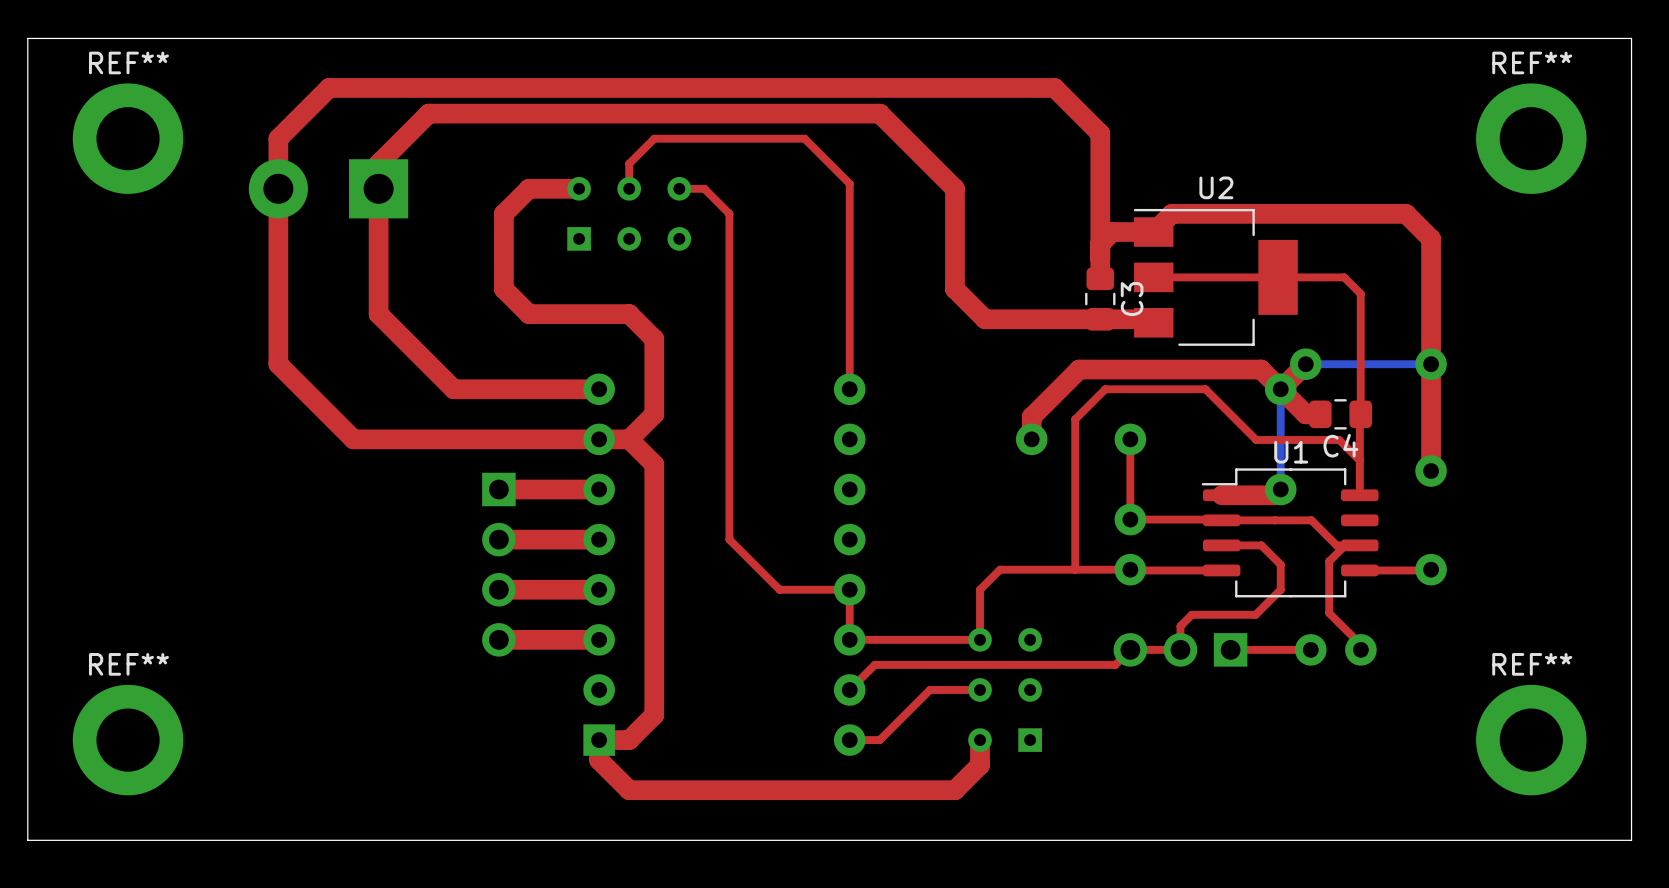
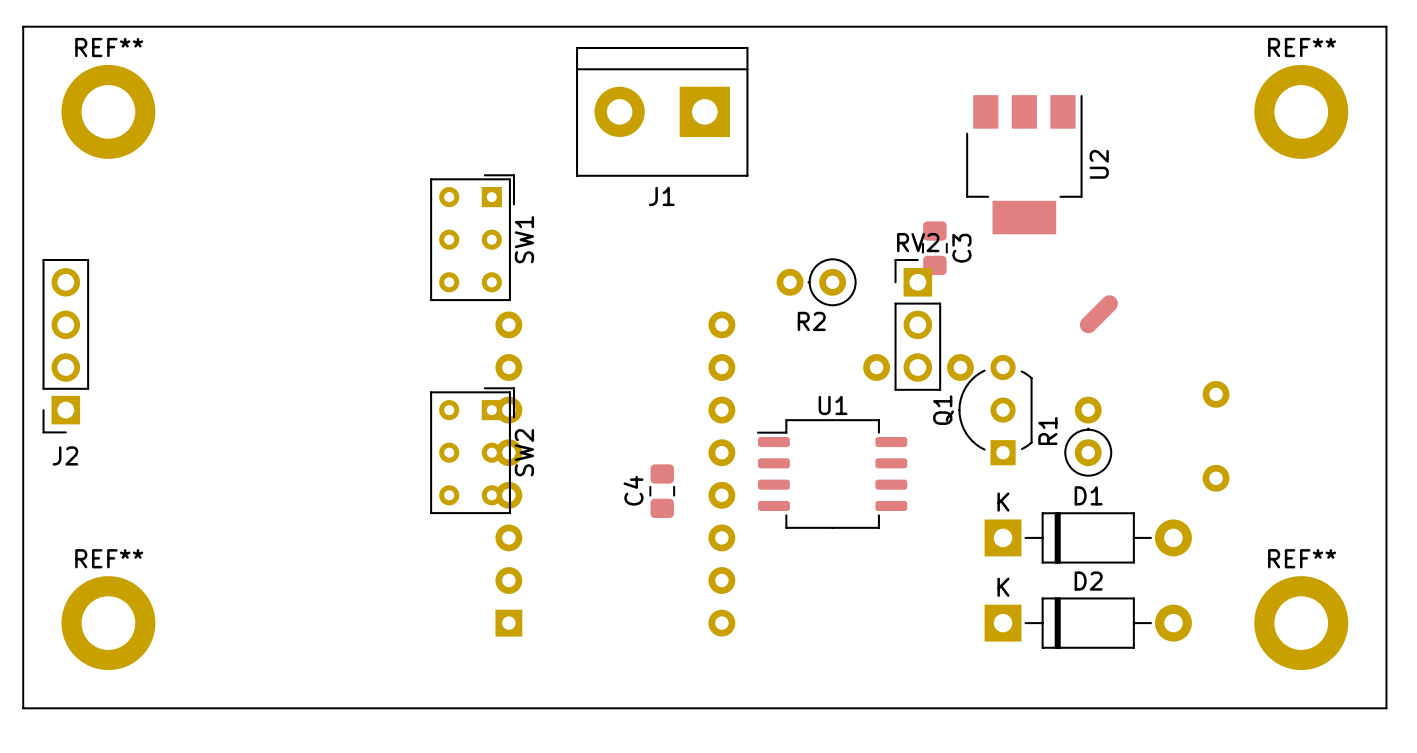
J1 side: bottom (328, 188) -> top (662, 111)
top track: (579, 188) (528, 188) (503, 213) (503, 289) (528, 314) (629, 314) (654, 339) (654, 414) (629, 439) -> none
top track: (629, 188) (629, 163) (654, 138) (804, 138) (849, 183) (849, 389) -> none
top track: (679, 188) (704, 188) (729, 213) (729, 539) (779, 589) (849, 589) (849, 639) (980, 639) (980, 589) (1000, 569) (1221, 570) -> none
SW2 side: bottom (629, 213) -> top (472, 450)
top track: (1100, 243) (1112, 232) (1153, 232) (1171, 213) (1406, 213) (1431, 238) (1431, 471) -> none
top track: (1153, 277) (1344, 277) (1360, 293) (1359, 495) -> none
U2 rotation: 0° (1215, 277) -> 90° clockwise (1024, 164)
top track: (1100, 278) (1100, 133) (1054, 87) (329, 87) (278, 138) (278, 364) (353, 439) (629, 439) -> none
SW1: none -> (472, 237)
top track: (1153, 322) (1150, 319) (985, 319) (954, 289) (954, 188) (879, 113) (428, 113) (378, 163) (378, 314) (453, 389) (599, 389) -> none
bottom track: (1305, 364) (1431, 364) -> none
via: (1305, 364) -> none
via: (1431, 364) -> none
bottom track: (1280, 389) (1280, 489) -> none
via: (1280, 389) -> none
top track: (1320, 414) (1305, 414) (1260, 369) (1079, 369) (1031, 417) (1031, 439) -> none
C4 rotation: 0° (1340, 414) -> 90° clockwise (662, 491)
C4 position: (1340, 414) -> (662, 491)
top track: (629, 439) (654, 464) (654, 715) (629, 740) (599, 740) (599, 760) (629, 790) (954, 790) (980, 765) (980, 740) -> none
top track: (1130, 439) (1130, 519) (1311, 520) (1336, 545) (1359, 545) -> none
top track: (1359, 460) (1339, 439) (1256, 439) (1205, 389) (1105, 389) (1075, 419) (1075, 569) -> none
top track: (498, 489) (599, 489) -> none
Q1: none -> (995, 410)
top track: (1280, 489) (1274, 495) (1221, 495) -> none
via: (1280, 489) -> none
R1: none -> (1088, 436)
U1 position: (1290, 532) -> (832, 474)
top track: (498, 539) (599, 539) -> none
part: (1130, 544) -> none
top track: (1221, 545) (1261, 545) (1280, 564) (1280, 589) (1255, 614) (1191, 614) (1180, 626) (1180, 649) (1130, 649) (1115, 664) (874, 664) (849, 689) -> none
top track: (1345, 545) (1329, 561) (1329, 613) (1360, 644) (1360, 649) -> none
J2 side: bottom (498, 564) -> top (65, 346)
top track: (1431, 569) (1359, 570) -> none
top track: (498, 589) (599, 589) -> none
top track: (498, 639) (599, 639) -> none
D1: none -> (1088, 537)
RV2 side: bottom (1180, 649) -> top (917, 324)
top track: (1230, 649) (1310, 649) -> none
R2 side: bottom (1335, 649) -> top (816, 282)
top track: (980, 689) (929, 689) (879, 740) (849, 740) -> none
part: (1005, 689) -> none
D2: none -> (1088, 623)

